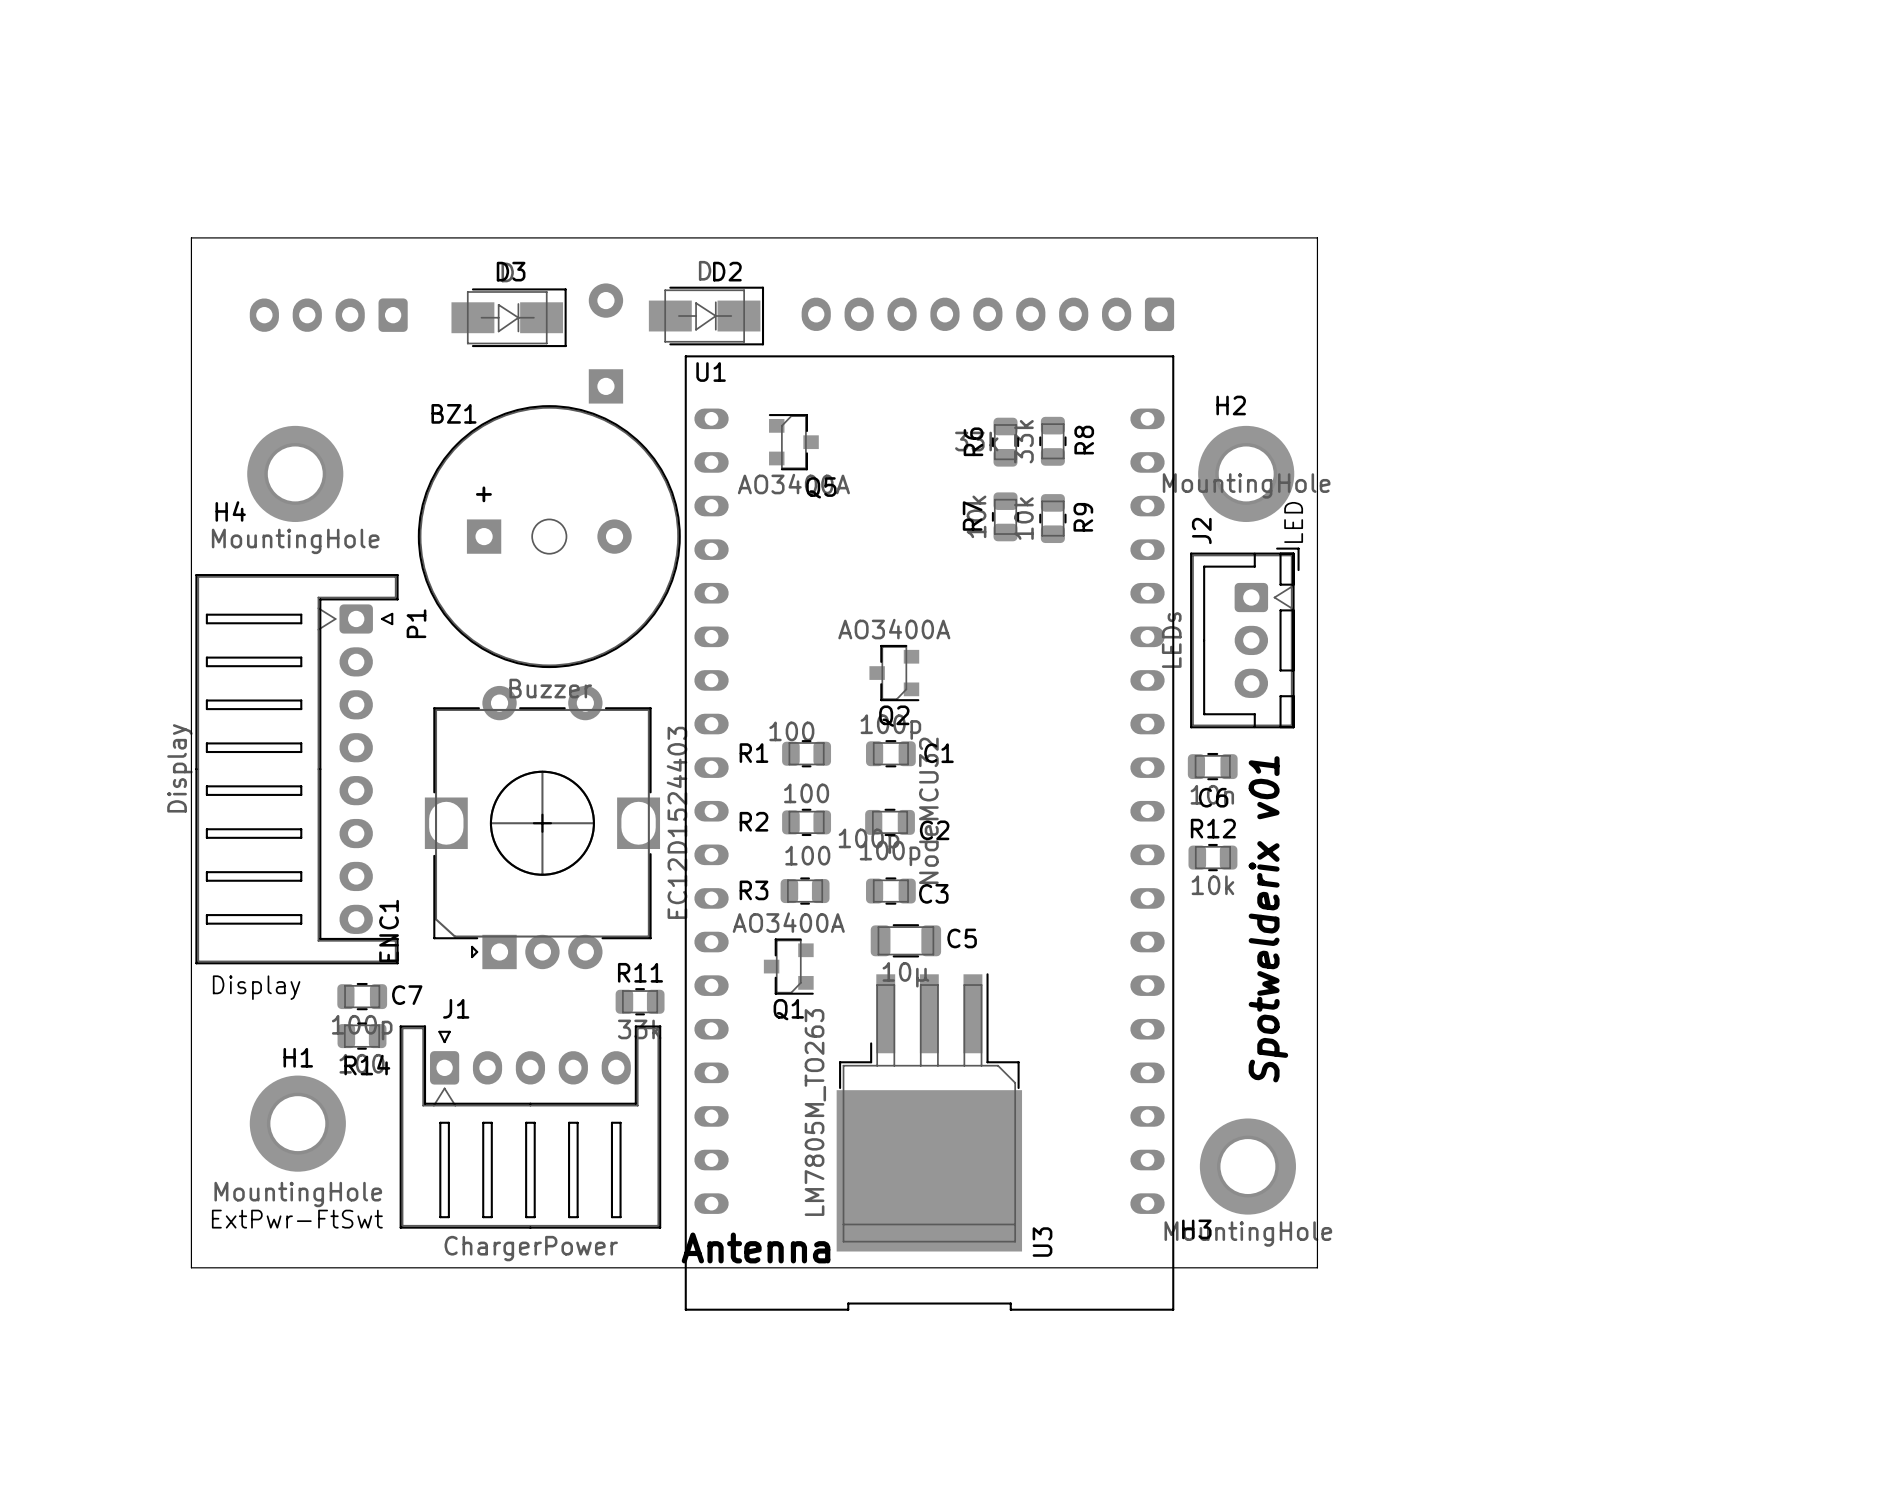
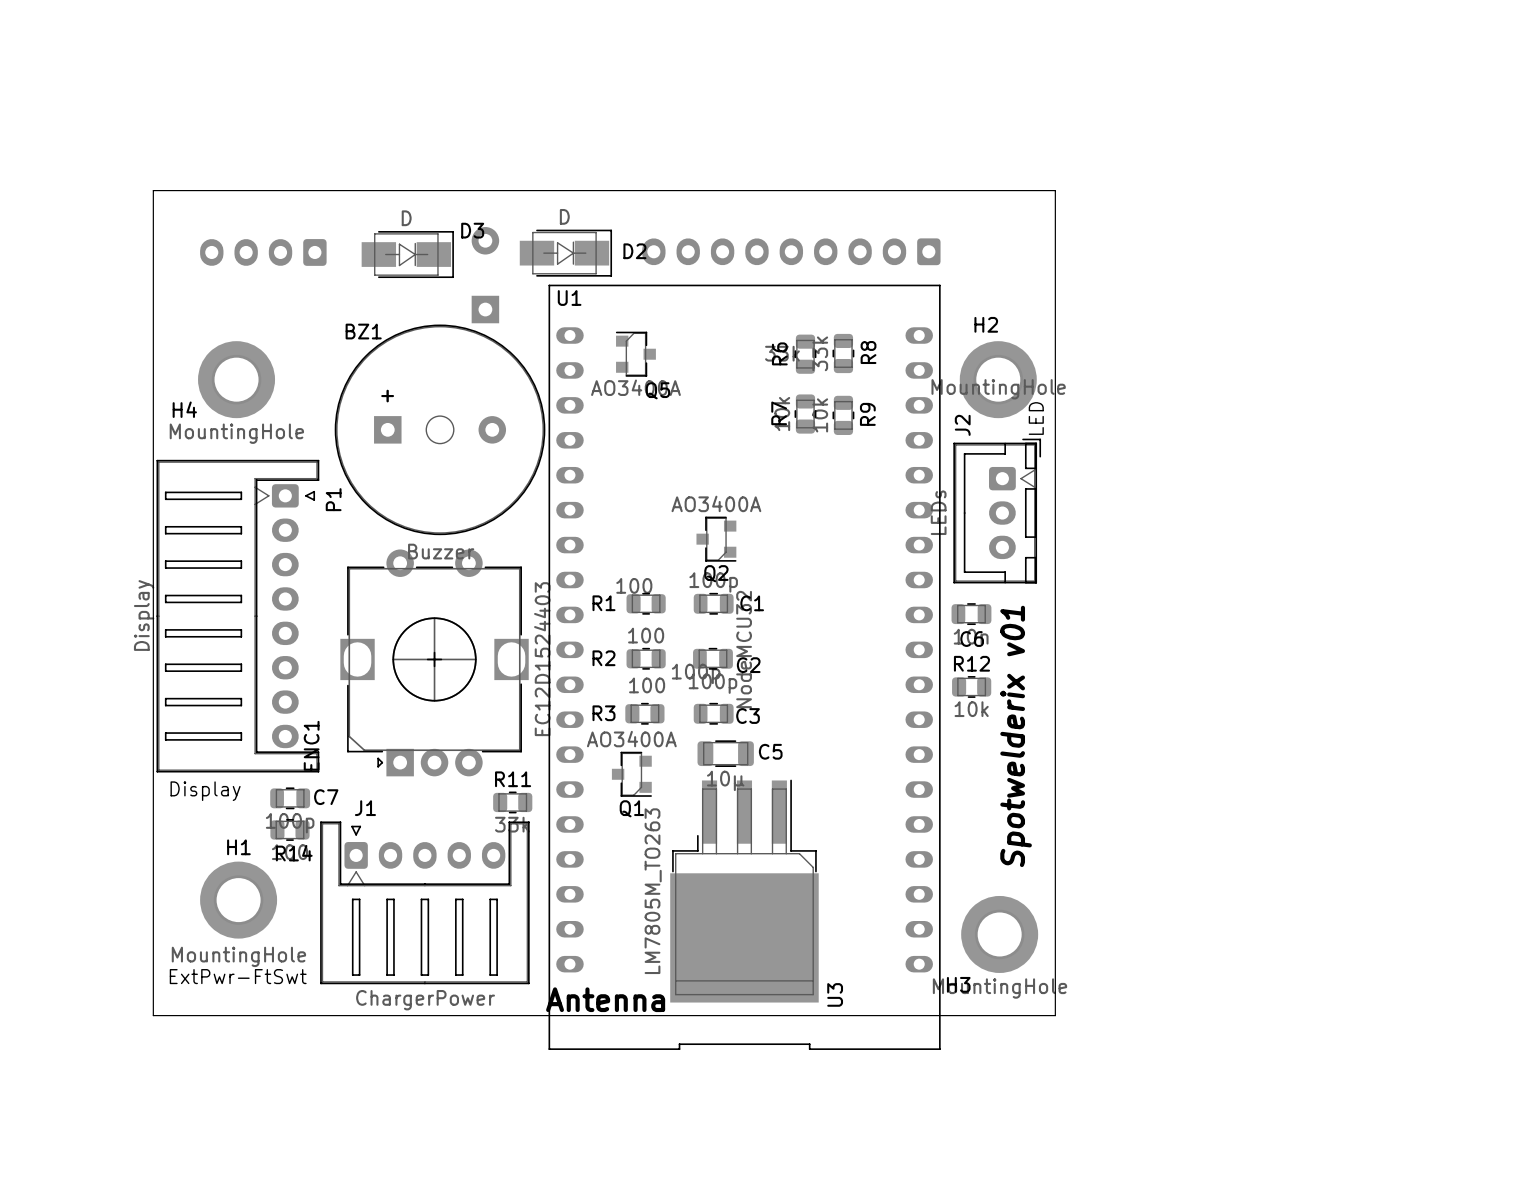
D3 name position: D3 (511, 271) -> D3 (472, 230)
D2 name position: D2 (727, 271) -> D2 (634, 251)

